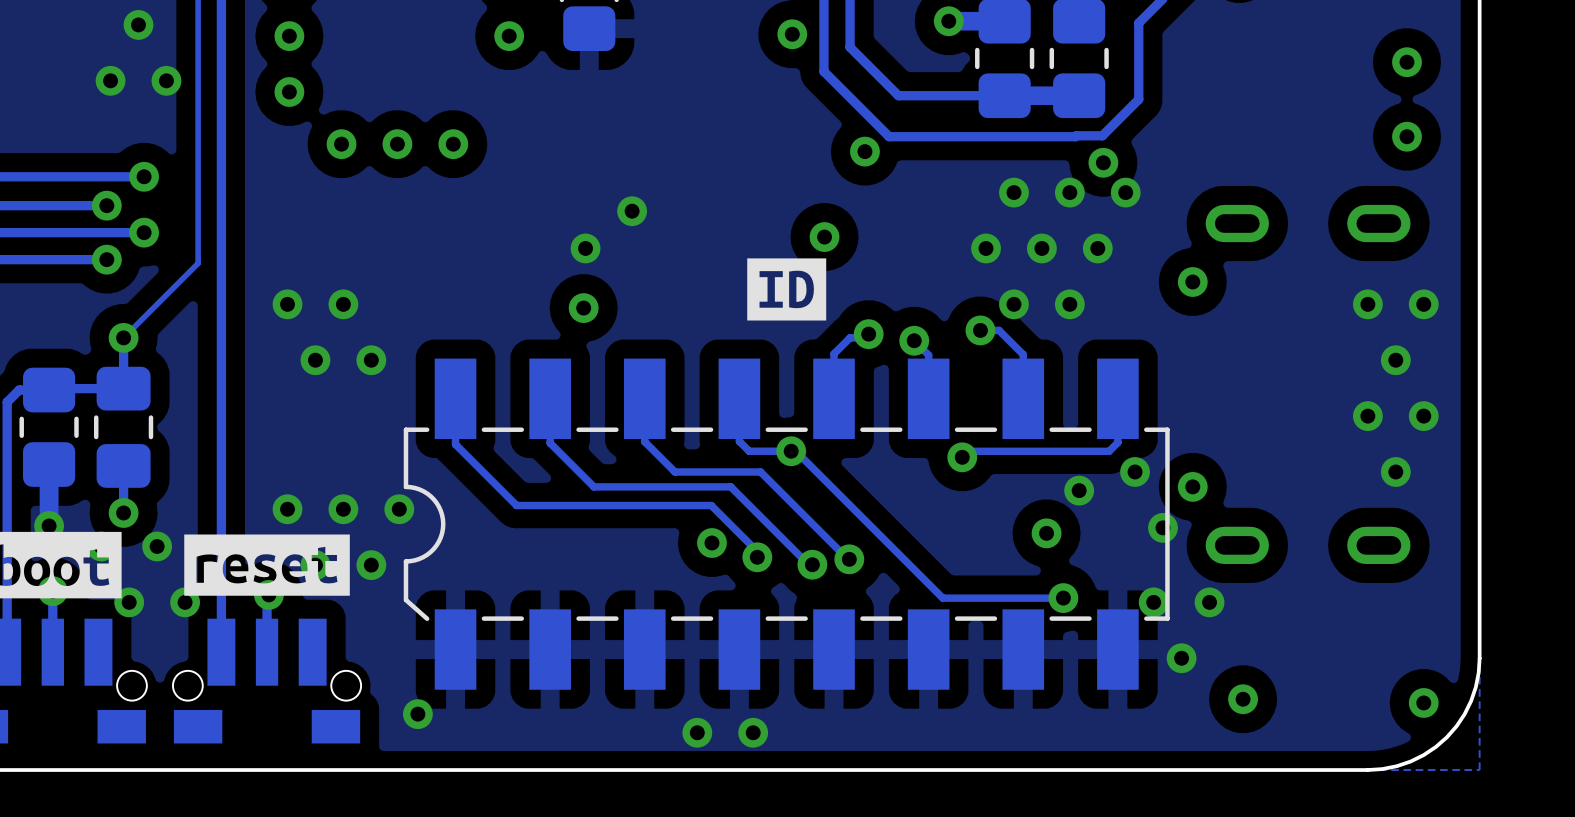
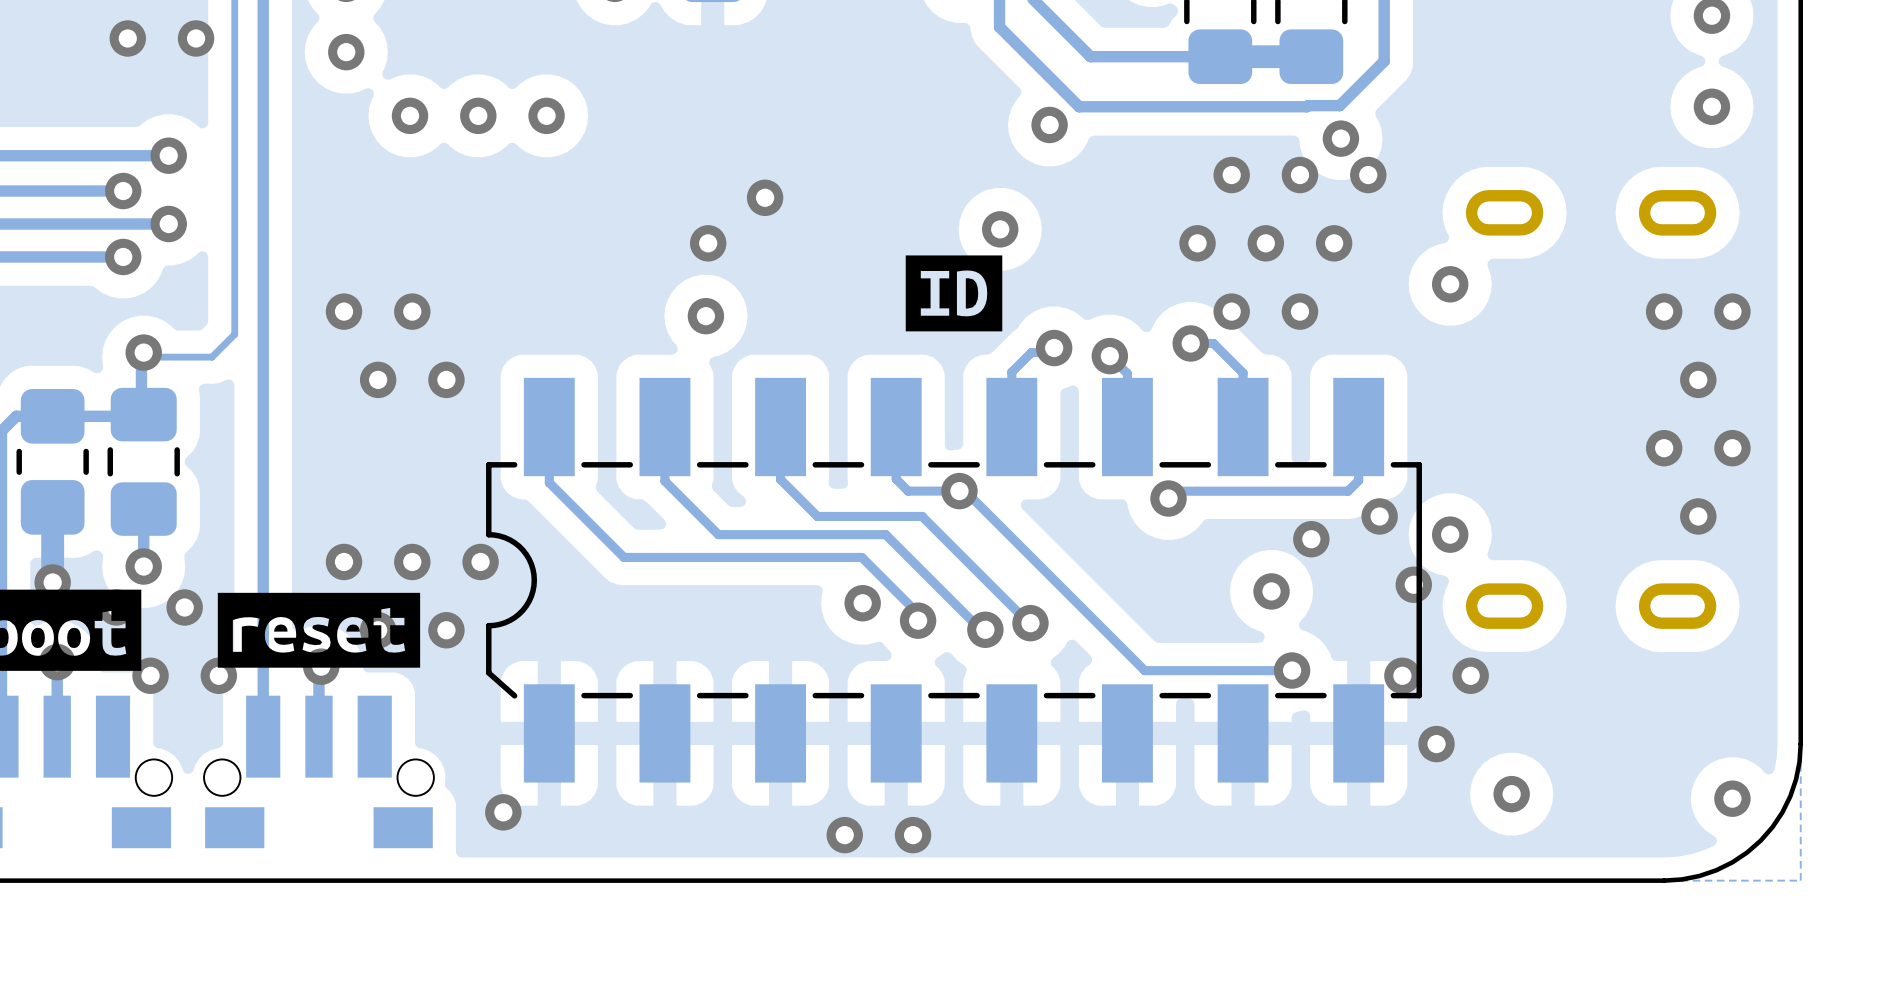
track: (198, 263) (123, 337) (123, 388) (49, 390) -> (234, 261) (234, 334) (212, 357) (143, 357) (141, 359) (141, 413) (138, 416) (52, 416)

